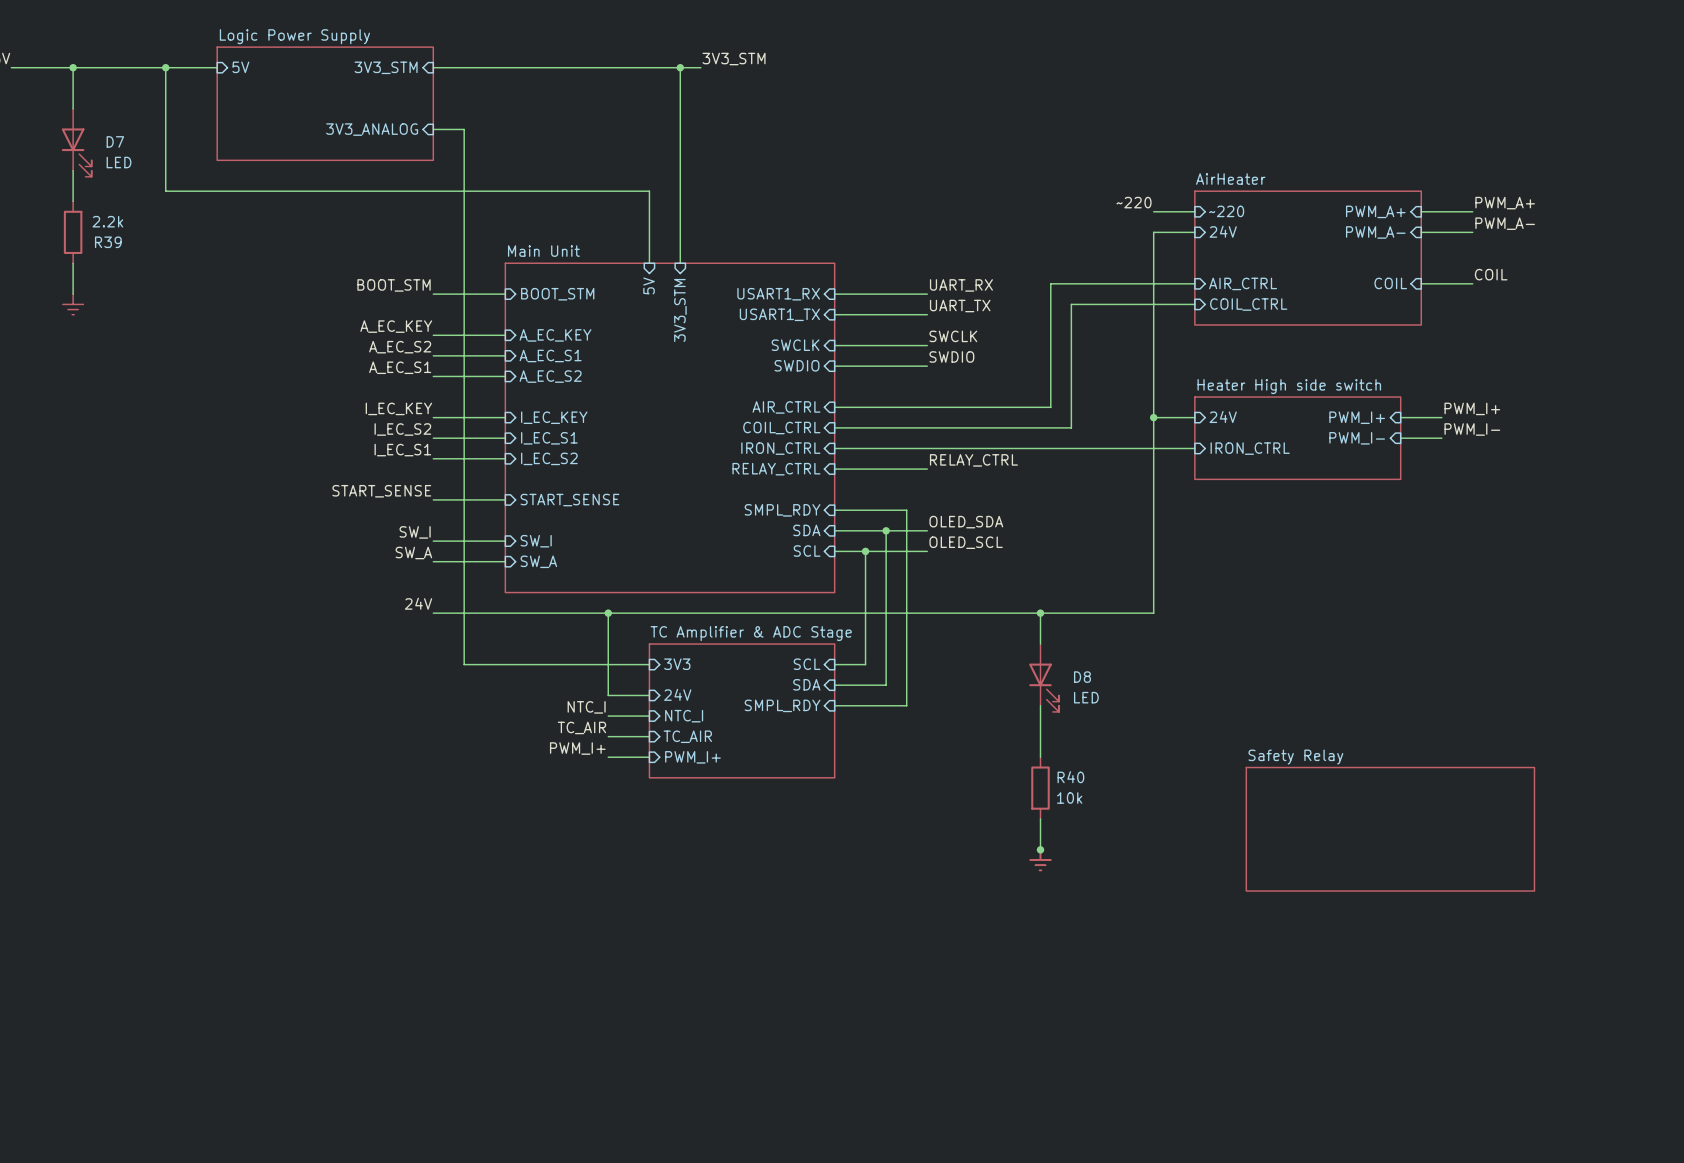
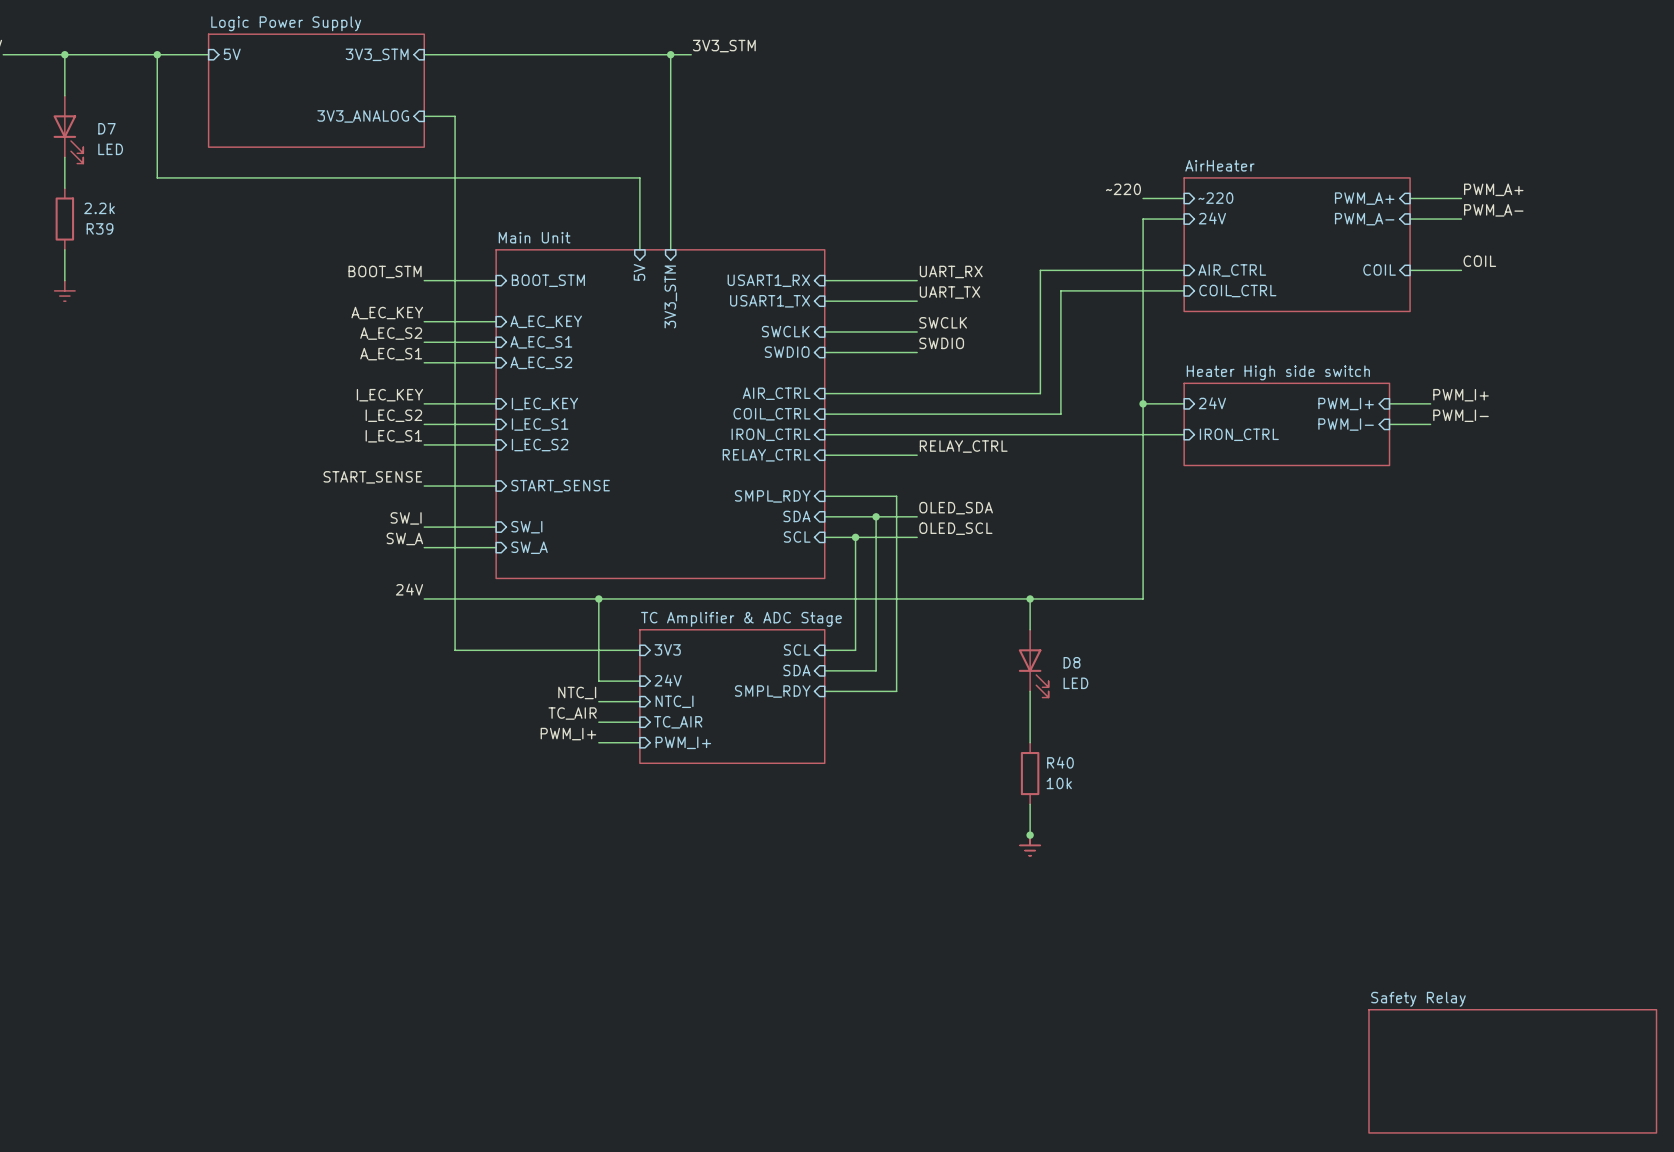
sheet Safety Relay: (1390, 829) -> none
sheet Safety Relay: none -> (1512, 1071)

